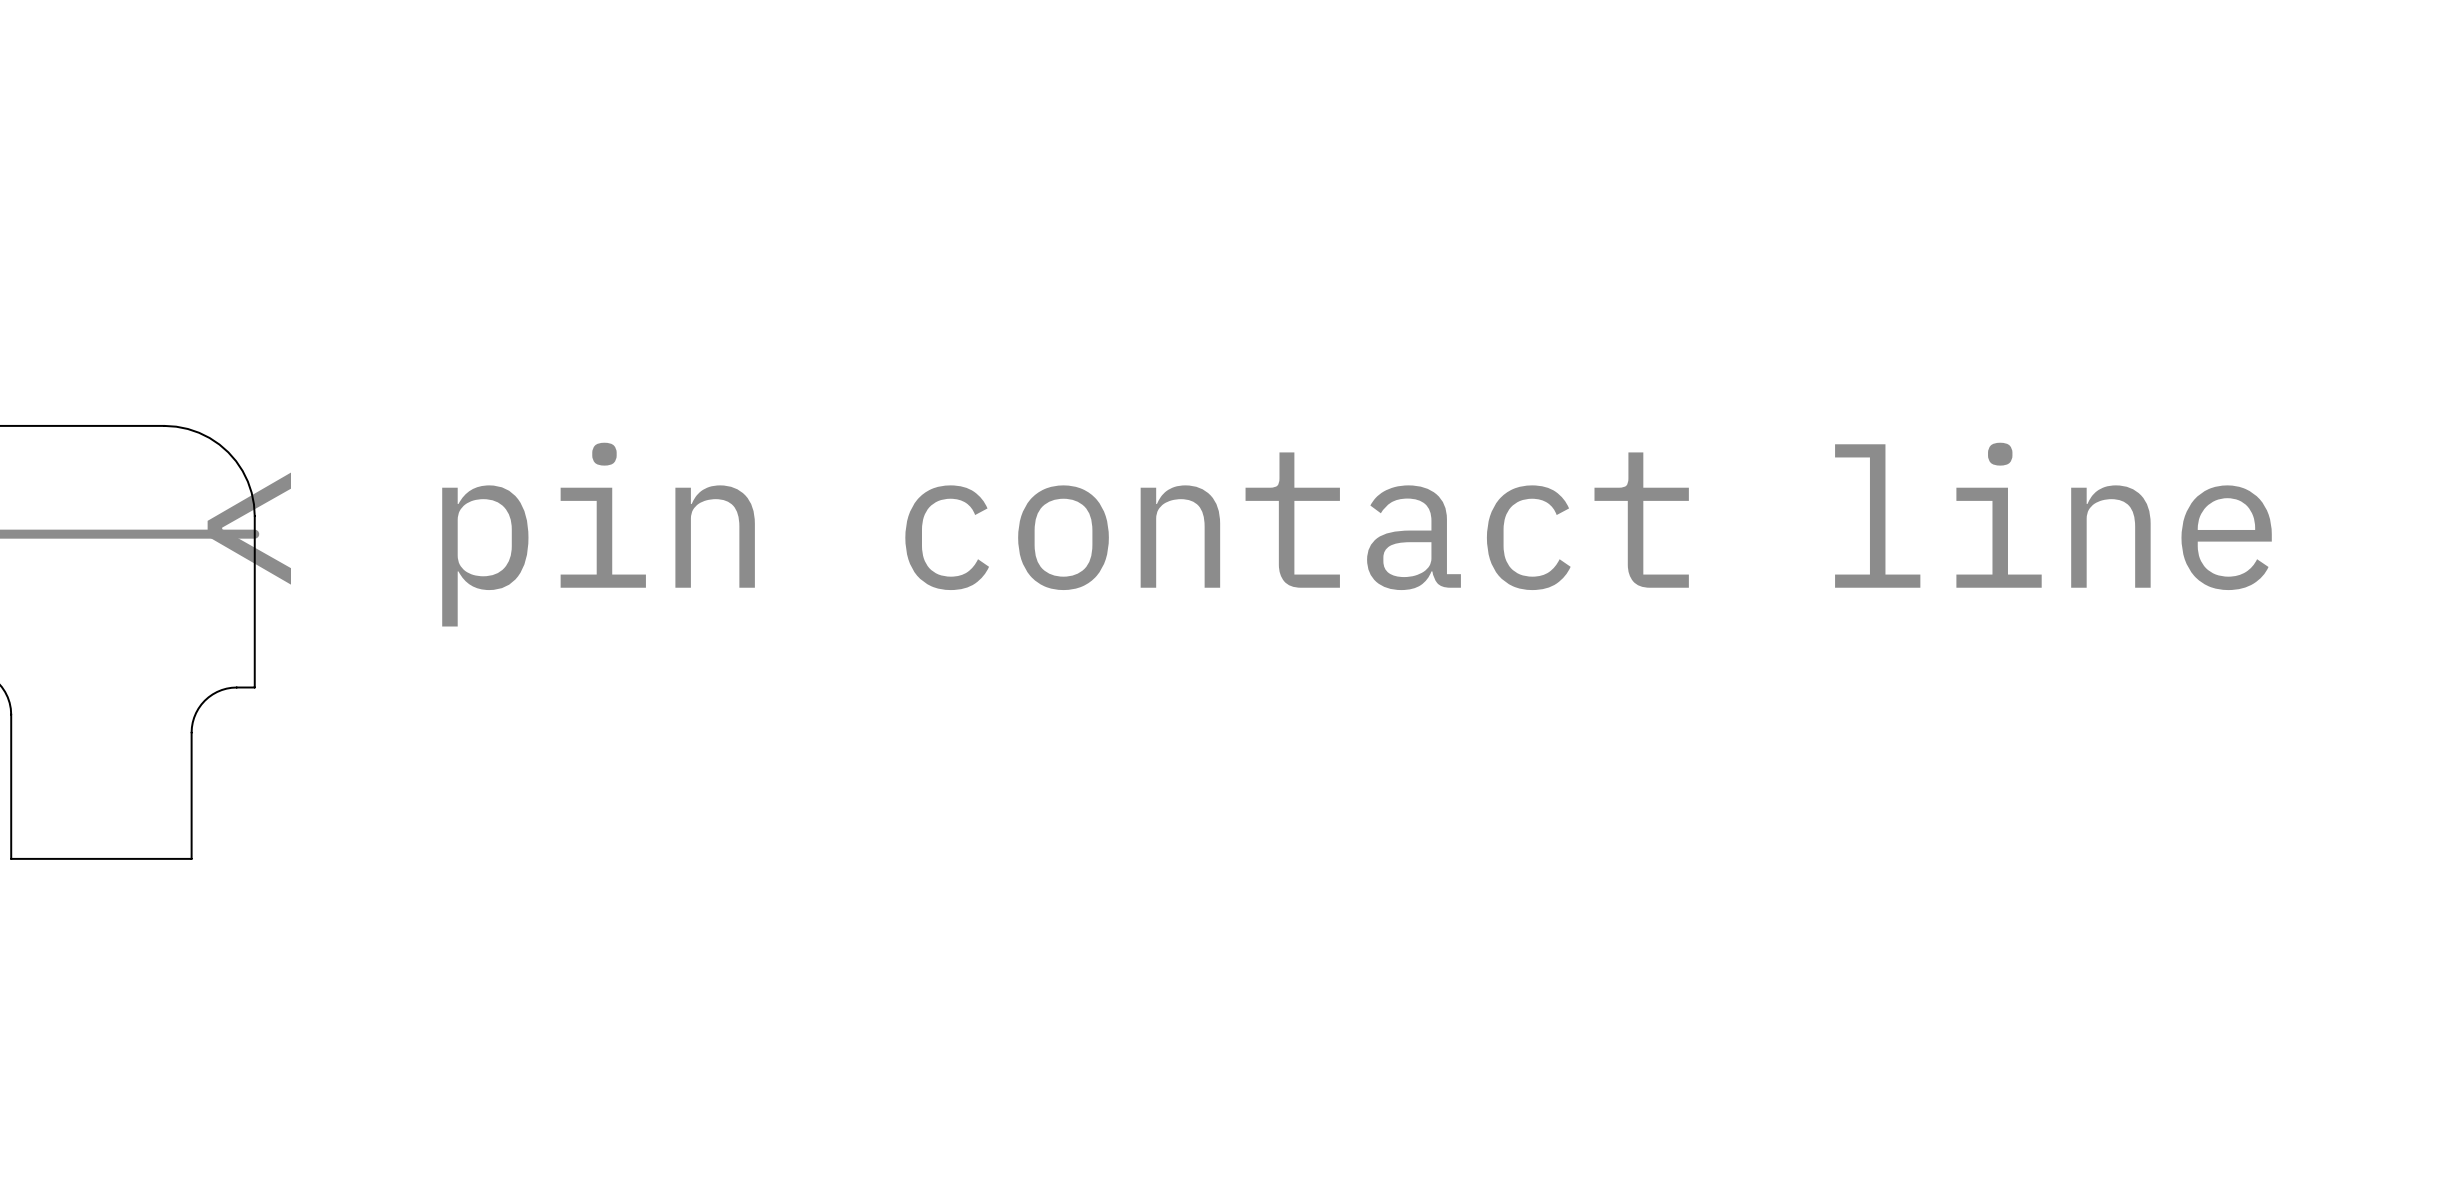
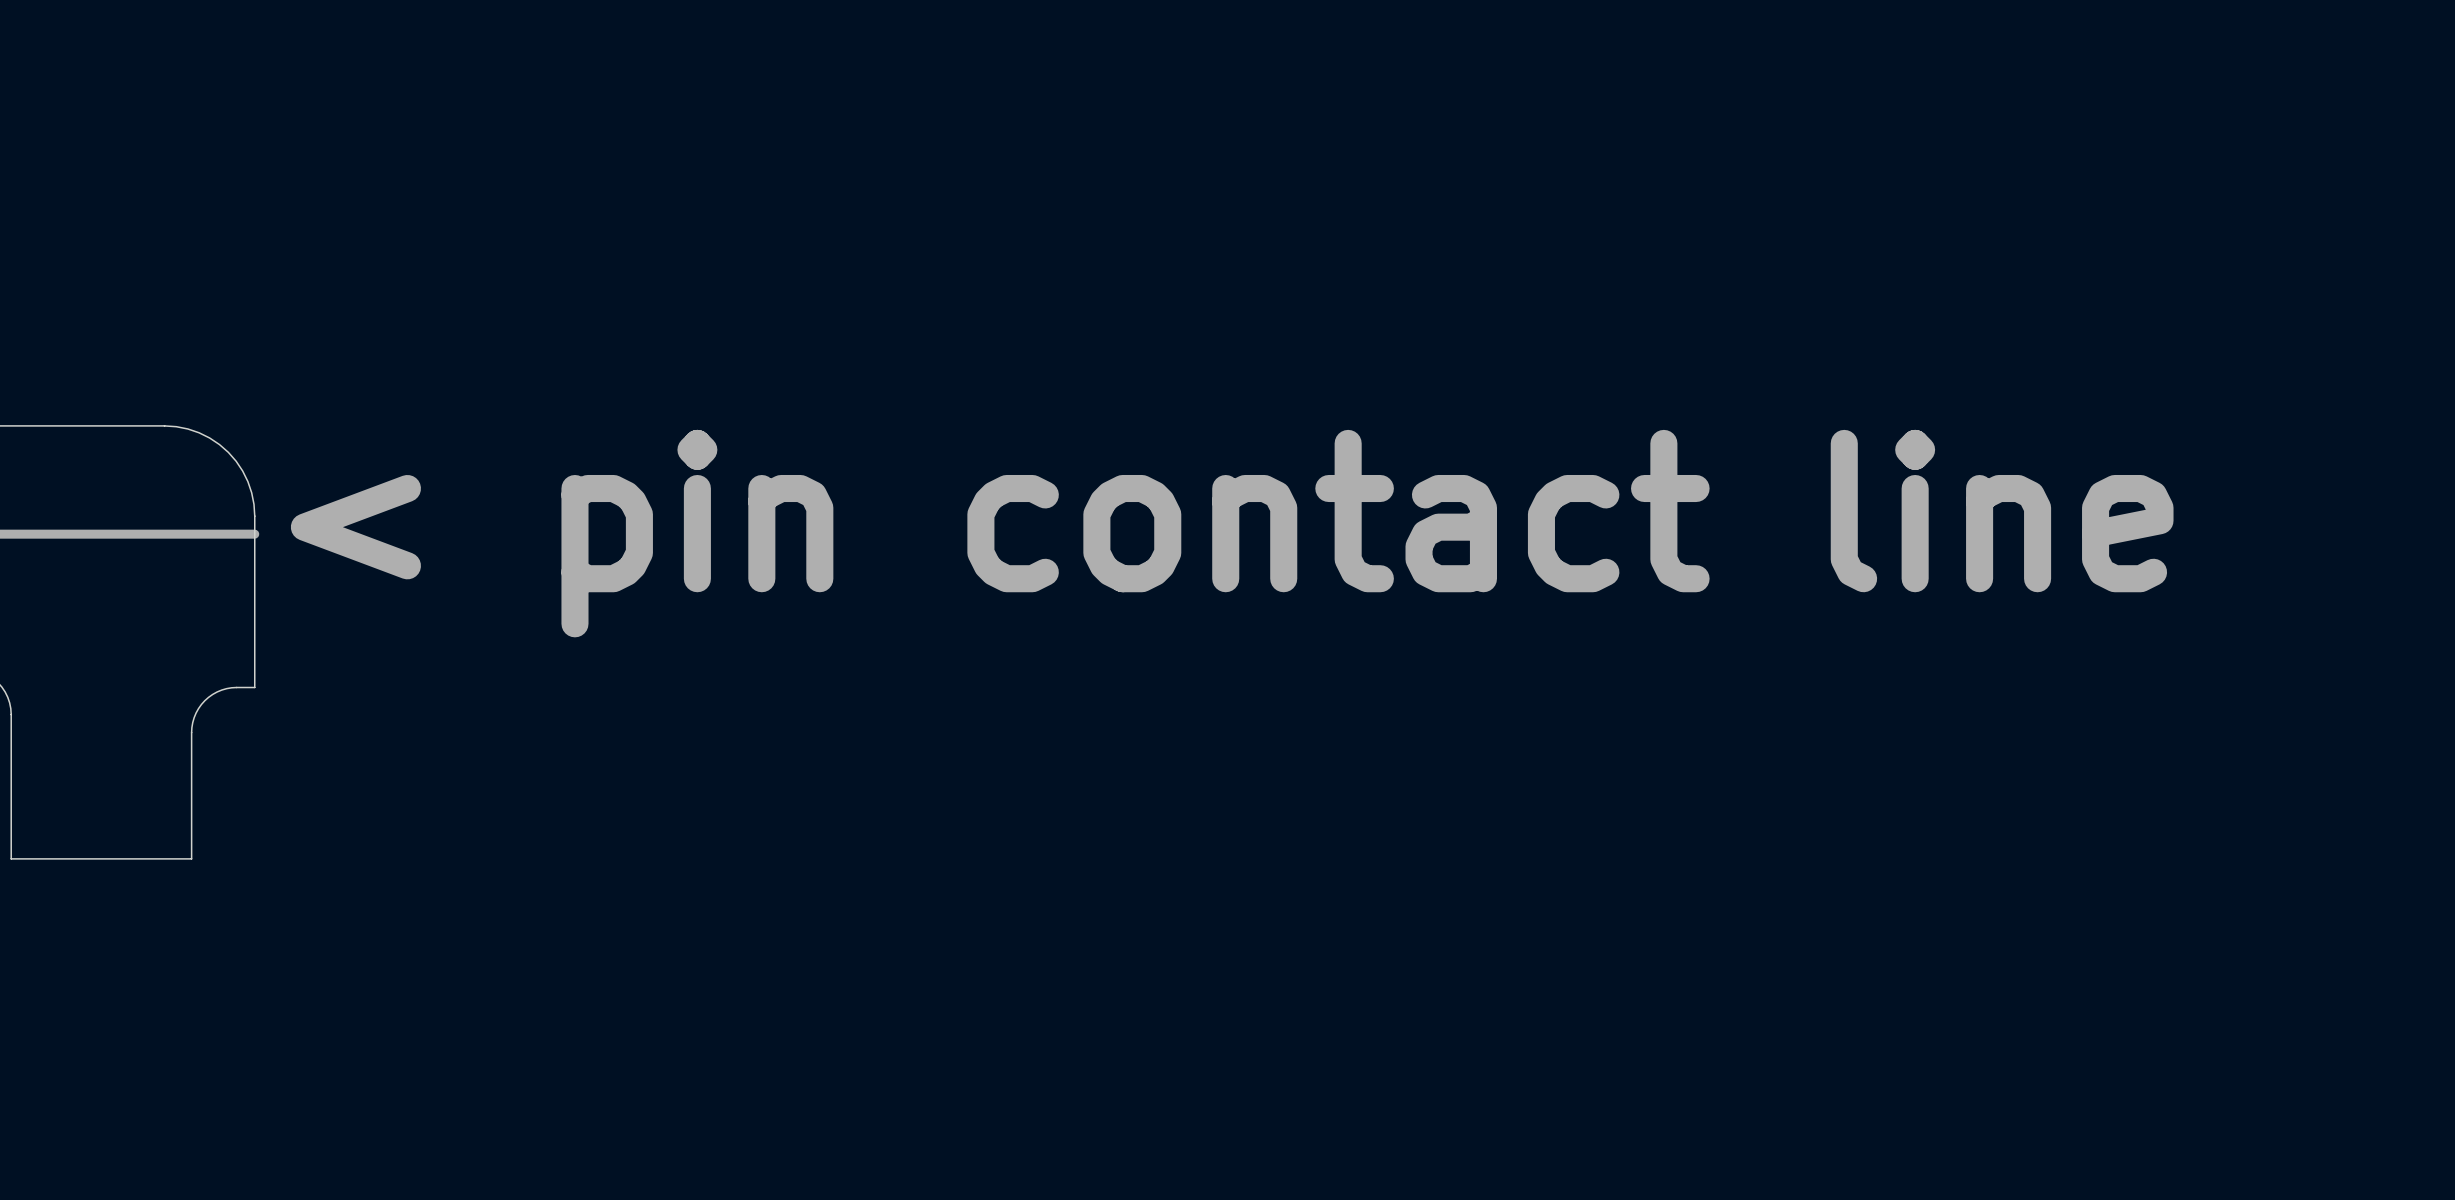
text position: < pin contact line (1239, 534) -> < pin contact line (1232, 533)

